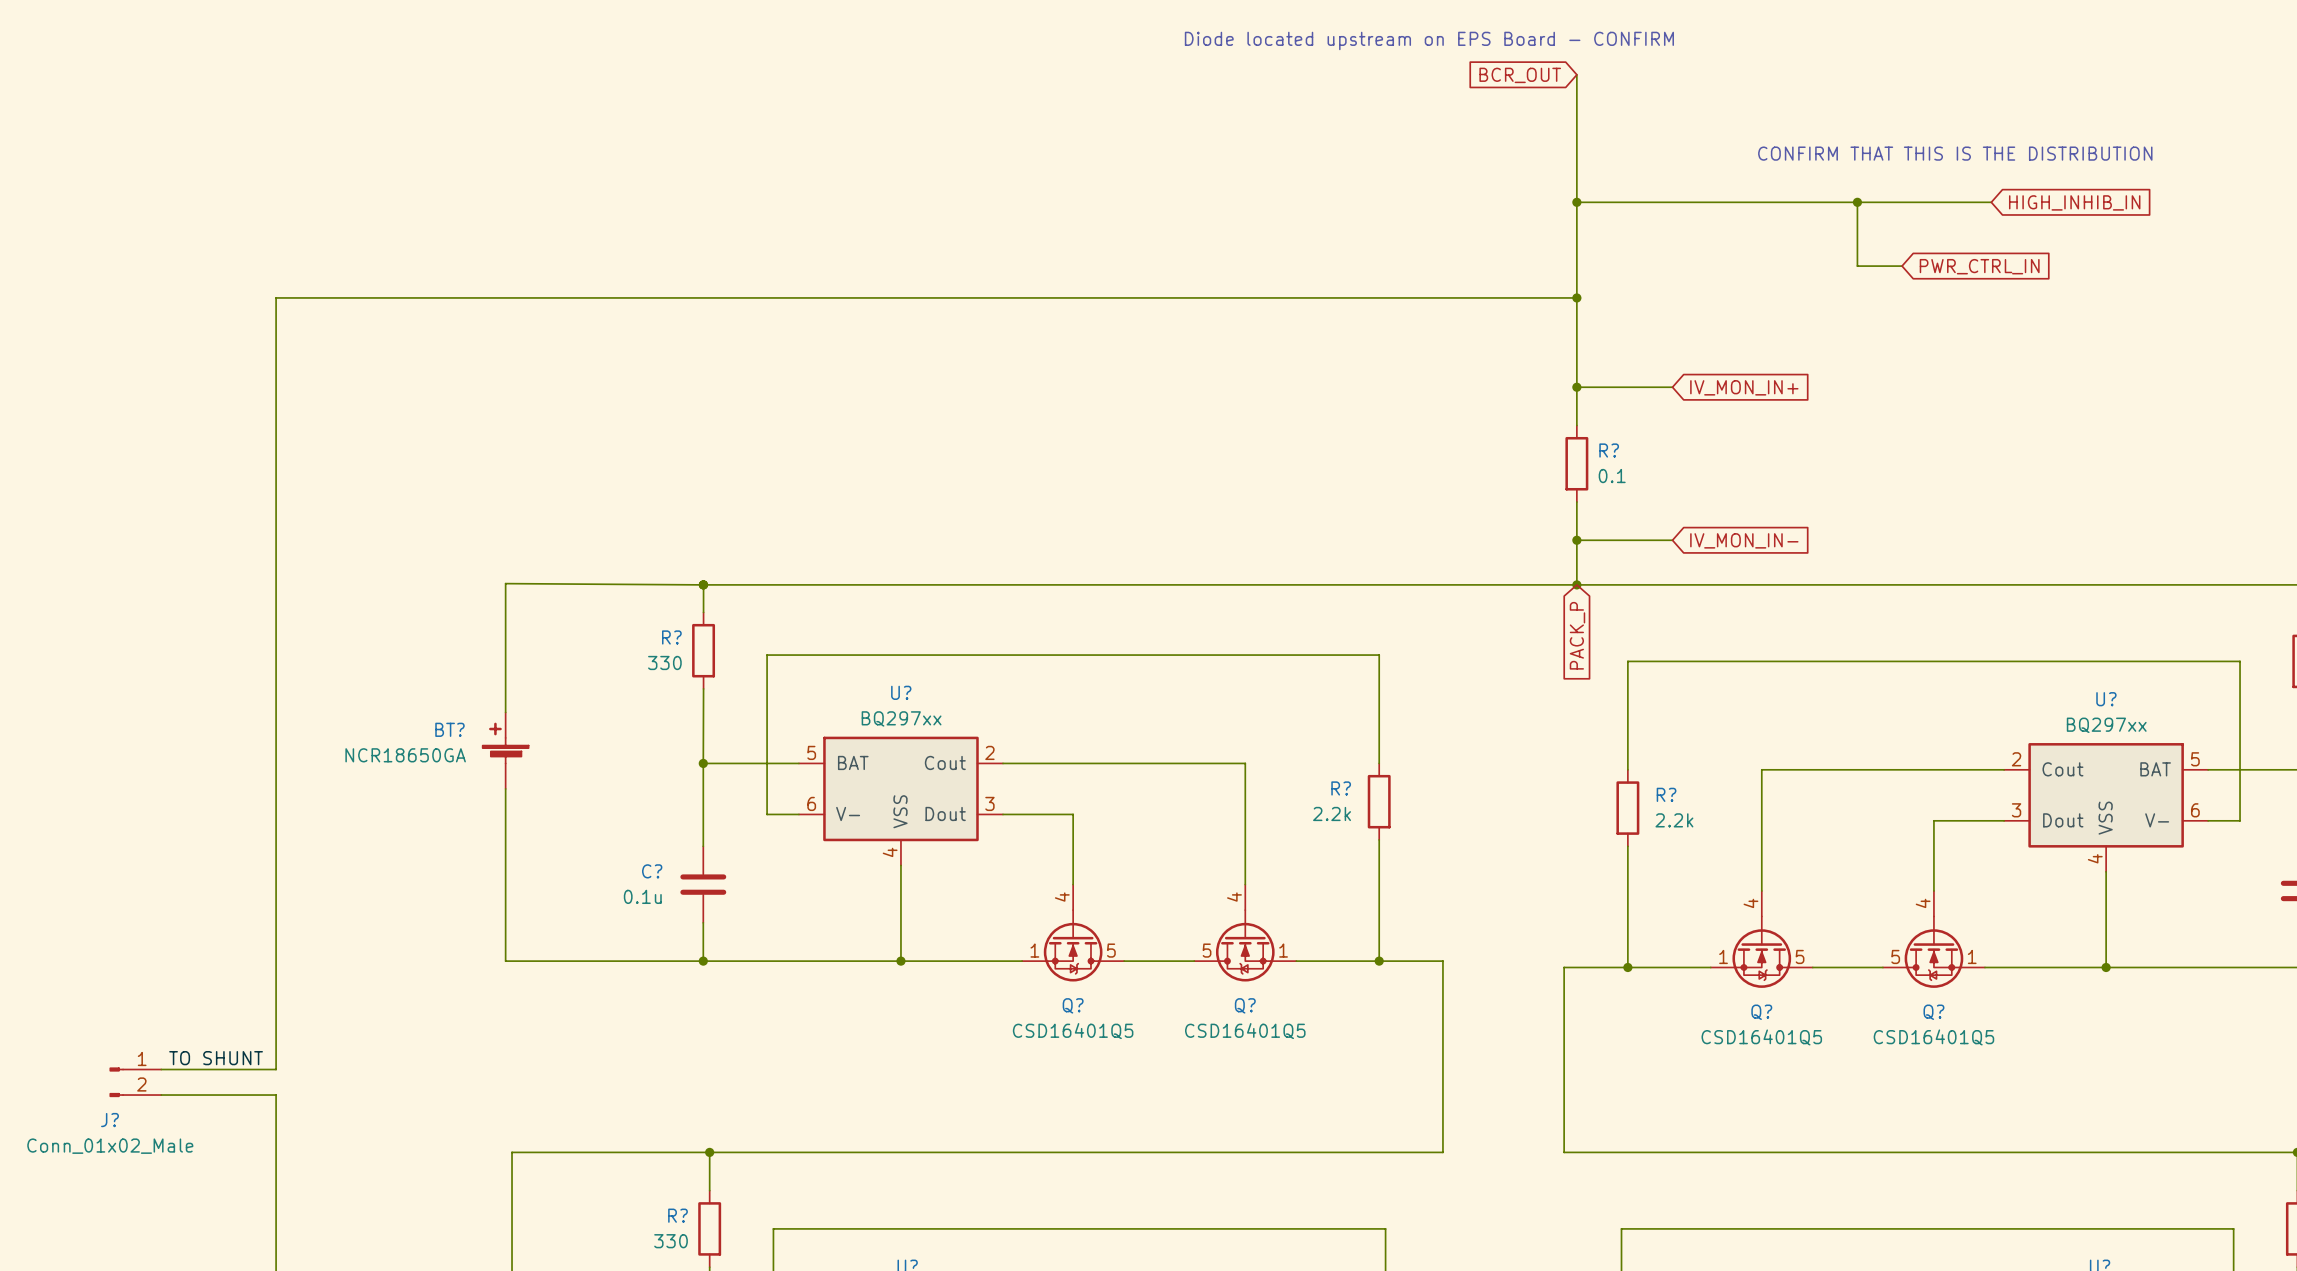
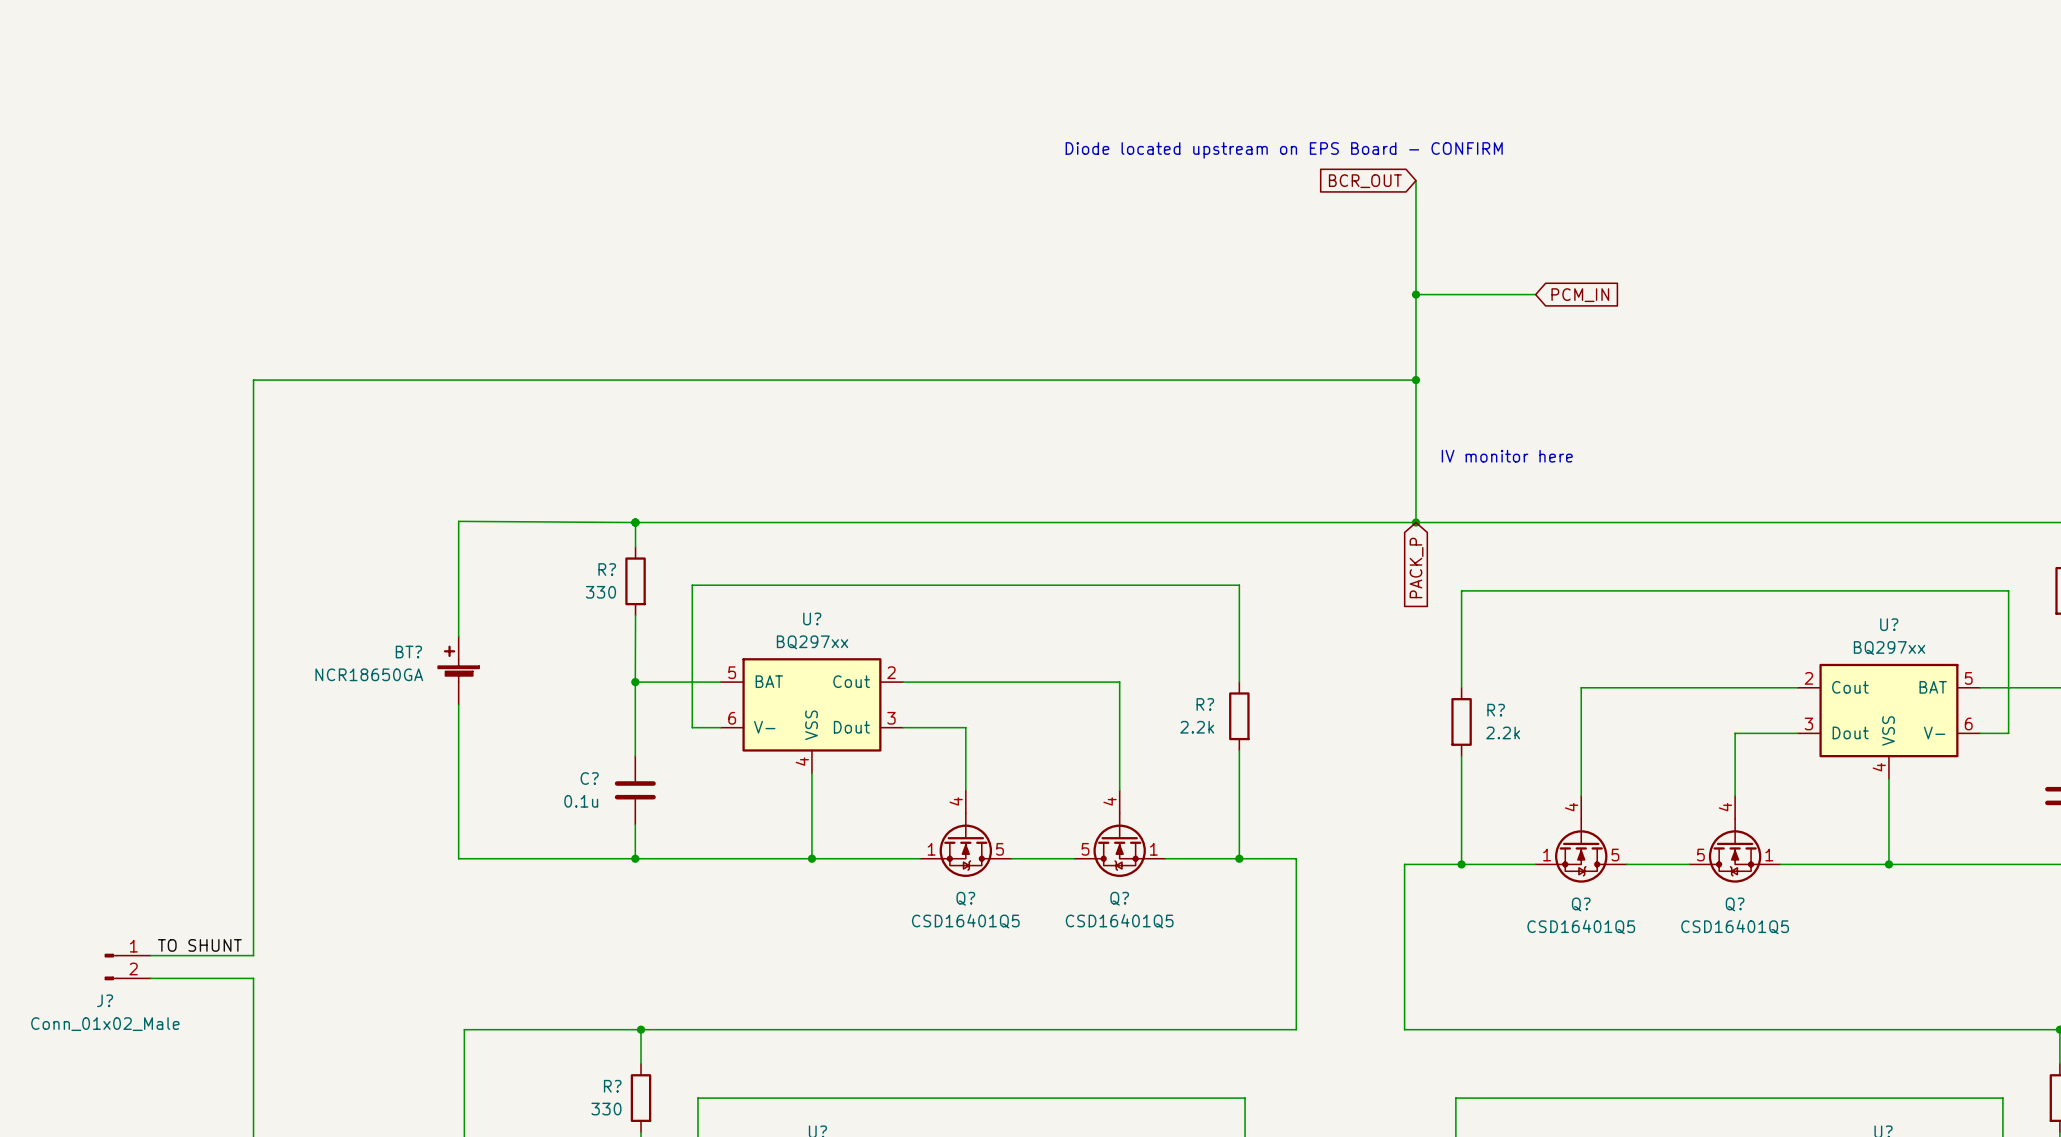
text position: Diode located upstream on EPS Board - CONFIRM (1429, 40) -> Diode located upstream on EPS Board - CONFIRM (1284, 150)
wire: (1576, 74) (1576, 202) (1991, 202) -> none
global label position: BCR_OUT (1520, 75) -> BCR_OUT (1365, 181)
text: CONFIRM THAT THIS IS THE DISTRIBUTION (1955, 153) -> none
junction: (1576, 202) -> none
wire: (1857, 202) (1857, 266) (1902, 266) -> none
junction: (1857, 202) -> none
global label: HIGH_INHIB_IN (2074, 202) -> none
global label: PWR_CTRL_IN (1979, 266) -> none
wire: (1576, 297) (276, 297) (276, 425) -> (1415, 448) (1415, 380) (253, 380)
junction: (1576, 297) -> none
wire: none -> (1415, 294) (1535, 294)
junction: none -> (1415, 294)
global label: none -> PCM_IN (1580, 295)
wire: (1576, 387) (1672, 387) -> none
junction: (1576, 387) -> none
global label: IV_MON_IN+ (1744, 387) -> none
junction: none -> (1415, 380)
R?: 0.1 (1576, 463) -> none
text: none -> IV monitor here (1507, 456)
wire: (1576, 540) (1672, 540) -> none
junction: (1576, 540) -> none
global label: IV_MON_IN- (1744, 540) -> none

